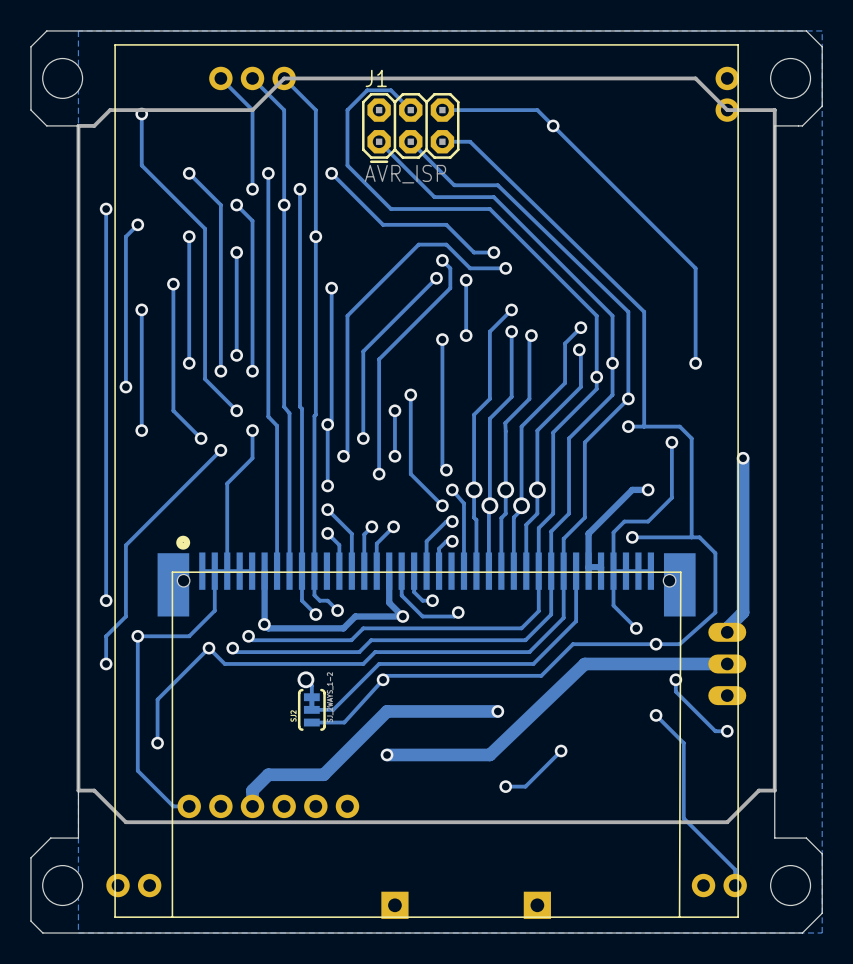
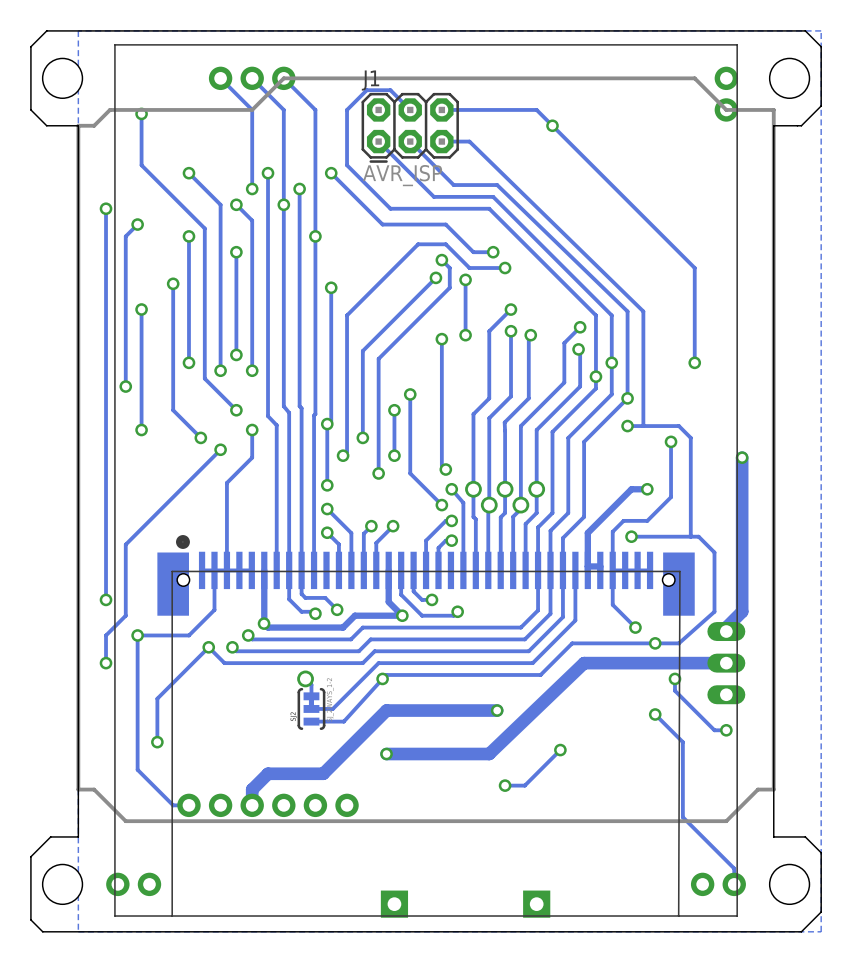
track: none -> (289, 570) (289, 599) (301, 611) (319, 611)
track: (314, 571) (314, 595) (319, 600) (327, 600) -> none
track: (301, 594) (301, 600) (315, 614) -> (301, 594) (305, 597) (325, 597) (327, 599)

